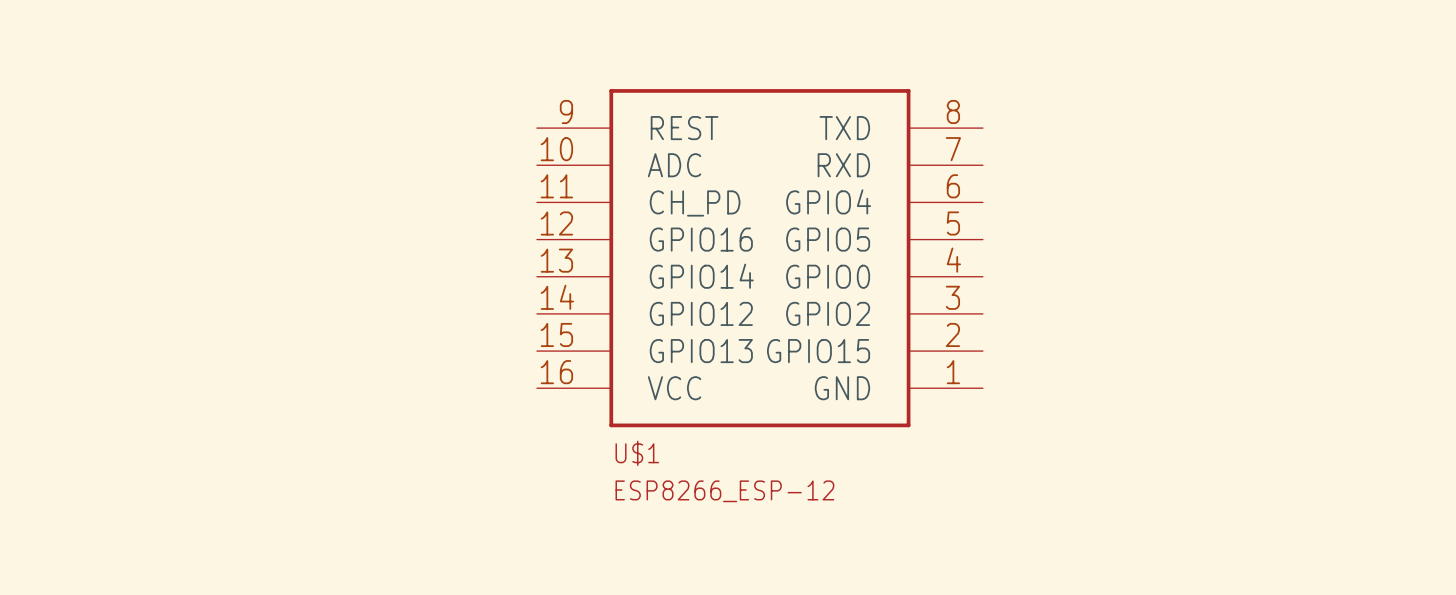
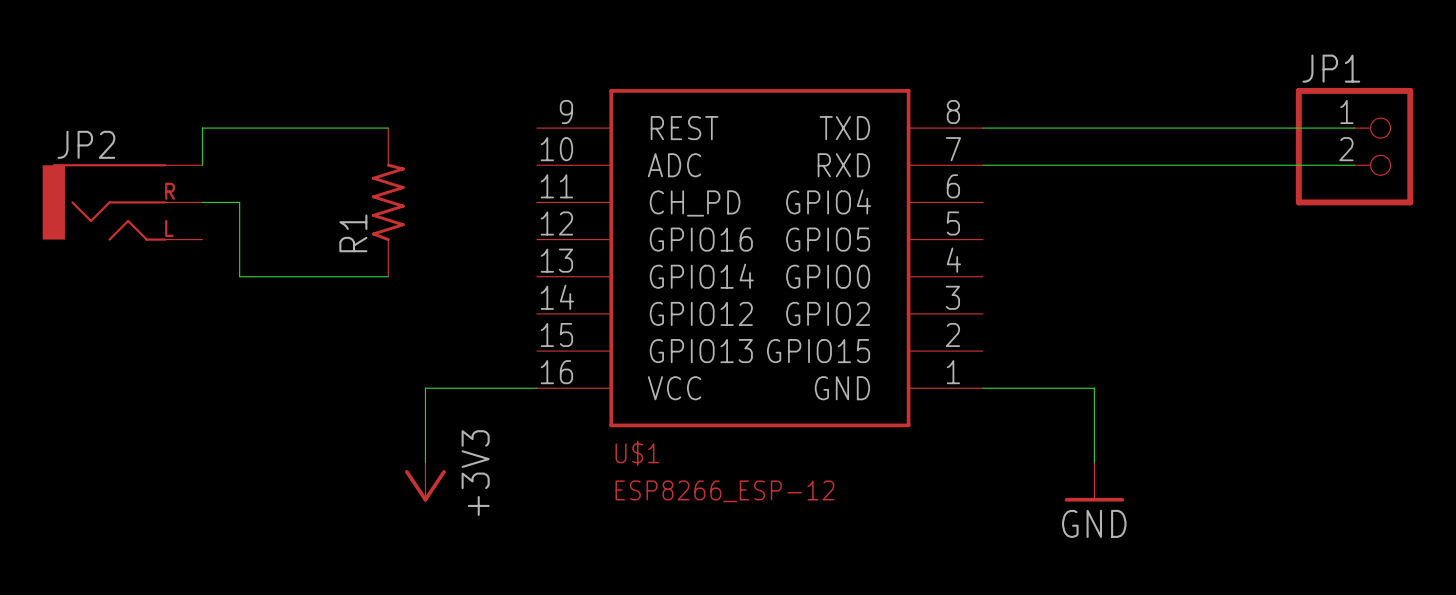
wire: none -> (388, 128) (202, 128) (202, 165)
wire: none -> (982, 128) (1354, 128)
JP1: none -> (1354, 146)
wire: none -> (982, 165) (1354, 165)
JP2: none -> (122, 202)
wire: none -> (202, 202) (239, 202) (239, 276) (388, 276)
R1: none -> (388, 202)
wire: none -> (536, 388) (425, 388) (425, 462)
wire: none -> (982, 388) (1094, 388) (1094, 462)
power symbol: none -> +3V3 (425, 482)
power symbol: none -> GND (1094, 482)

